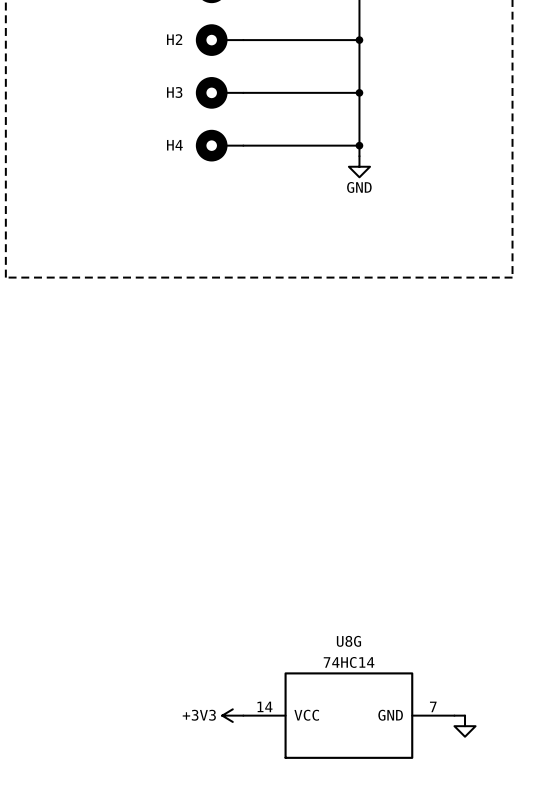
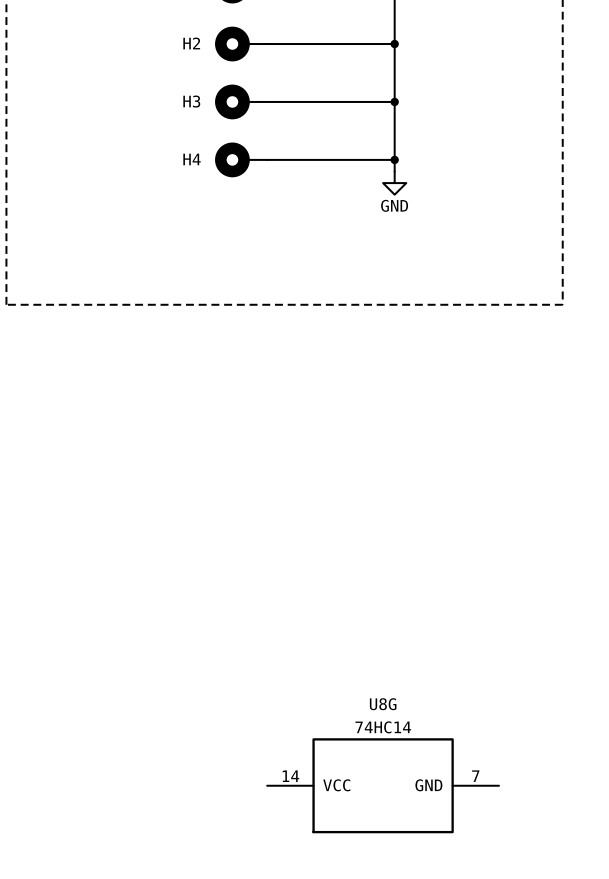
power symbol: +3V3 (232, 715) -> none
wire: (454, 715) (465, 715) -> none
power symbol: (465, 726) -> none

